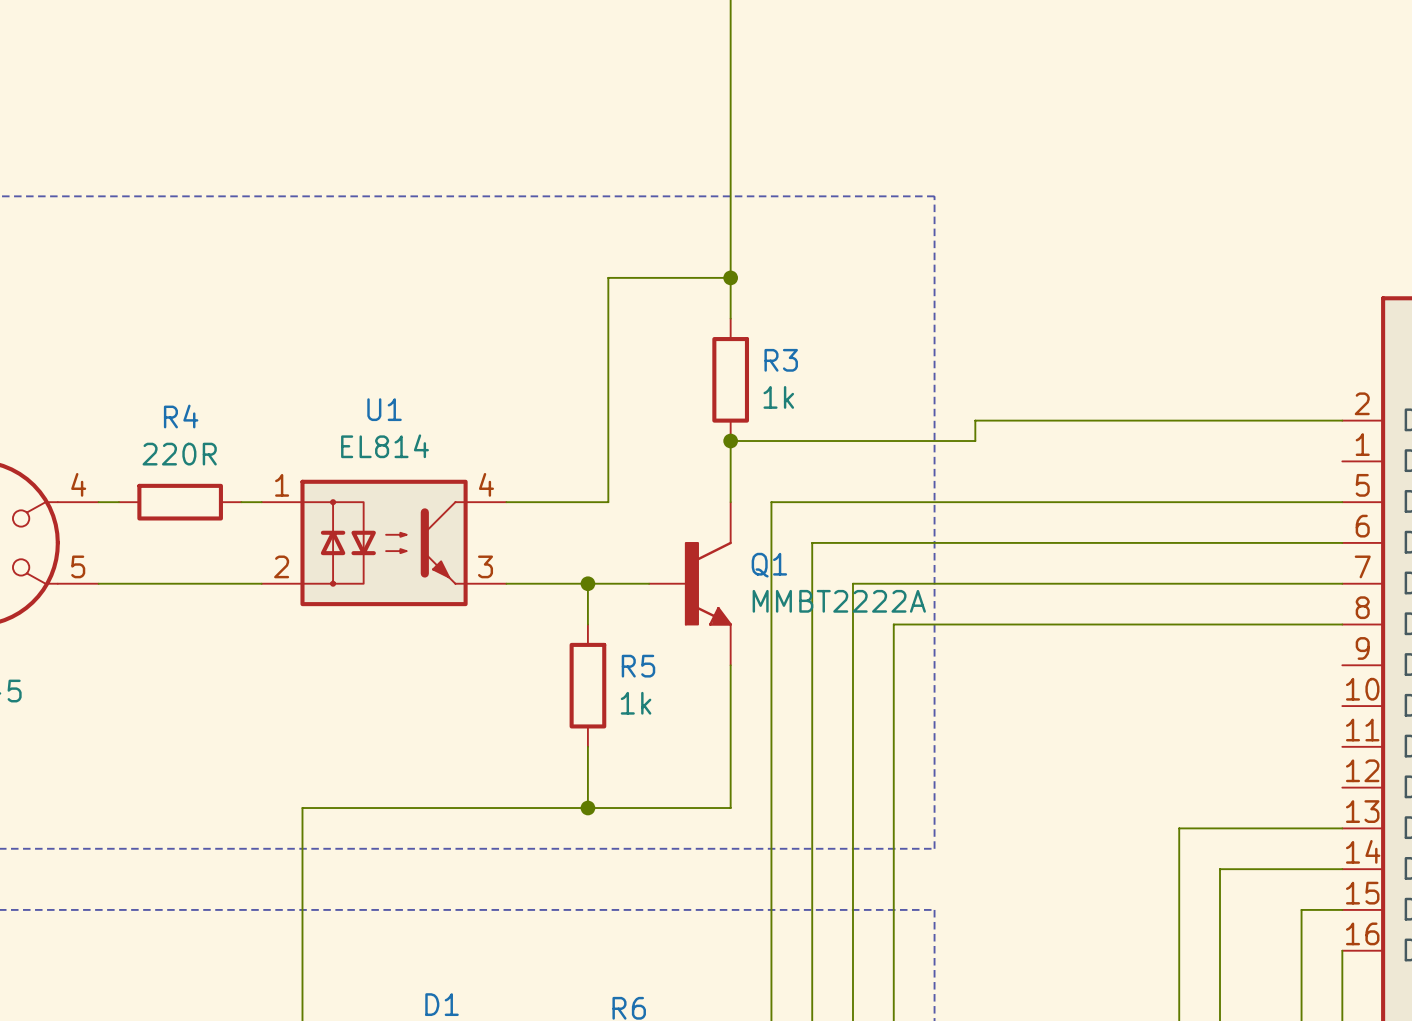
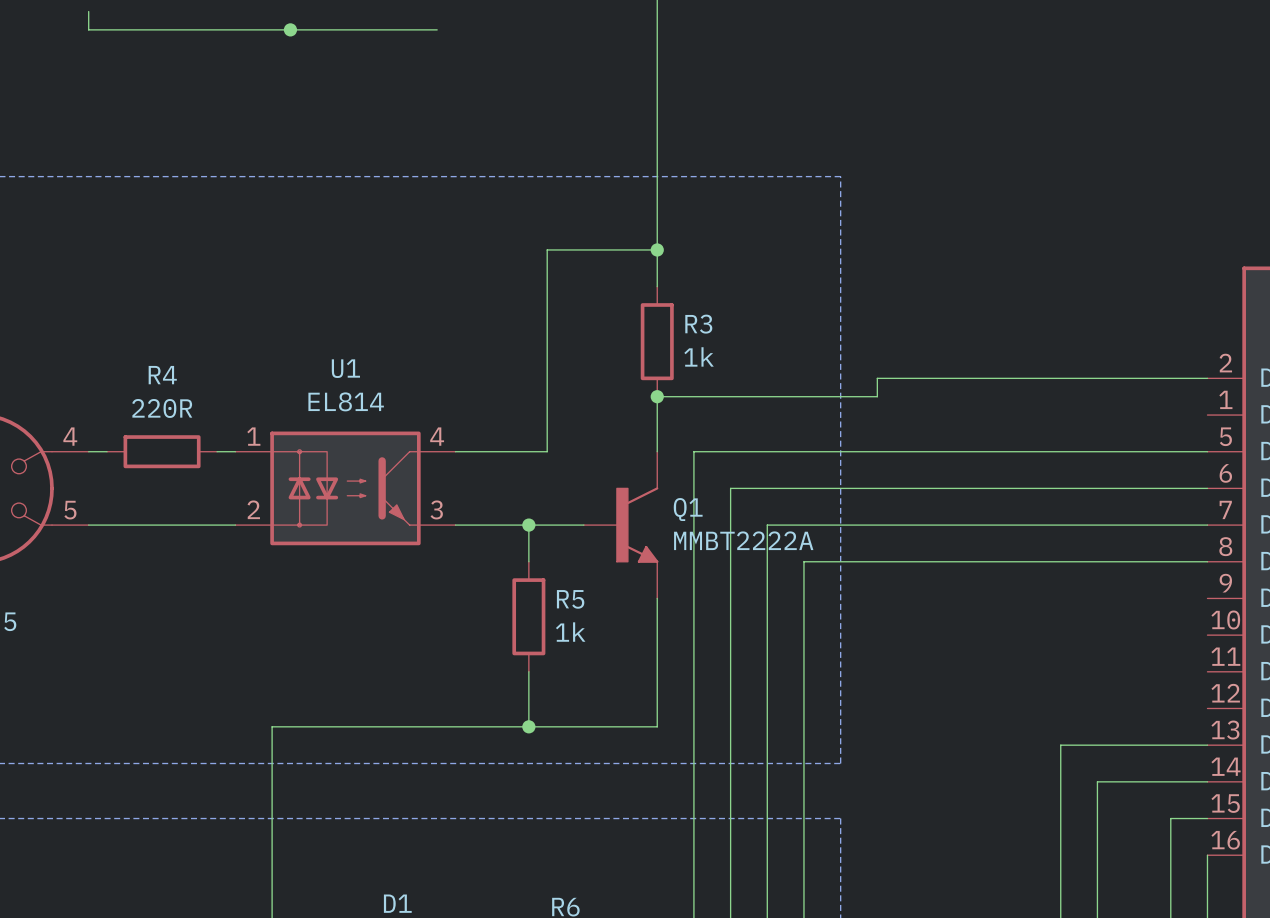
wire: none -> (88, 11) (88, 29) (437, 29)
junction: none -> (290, 29)

